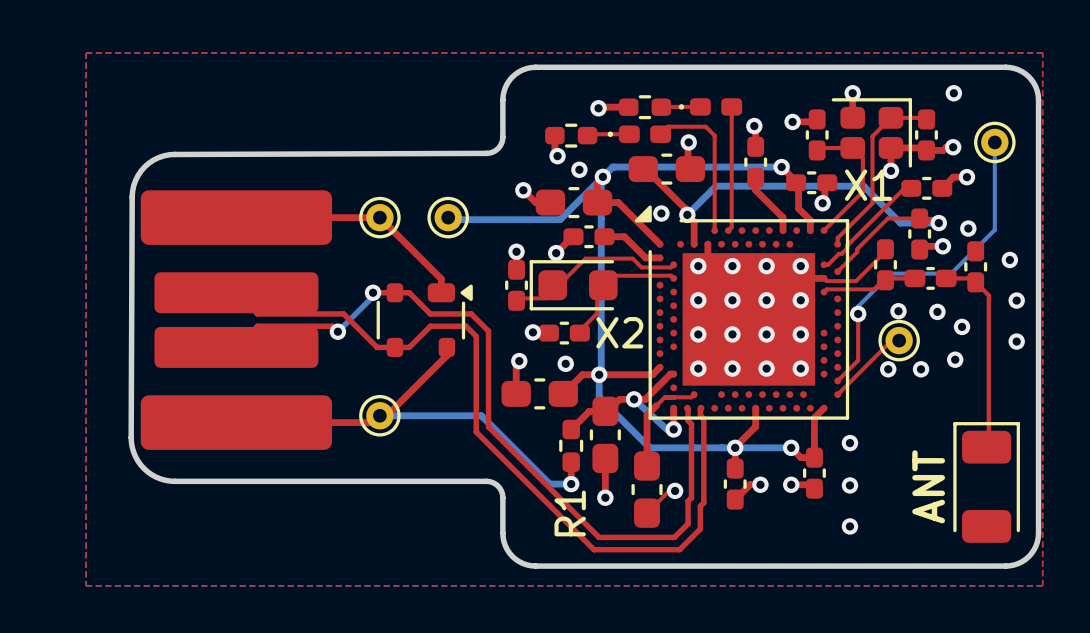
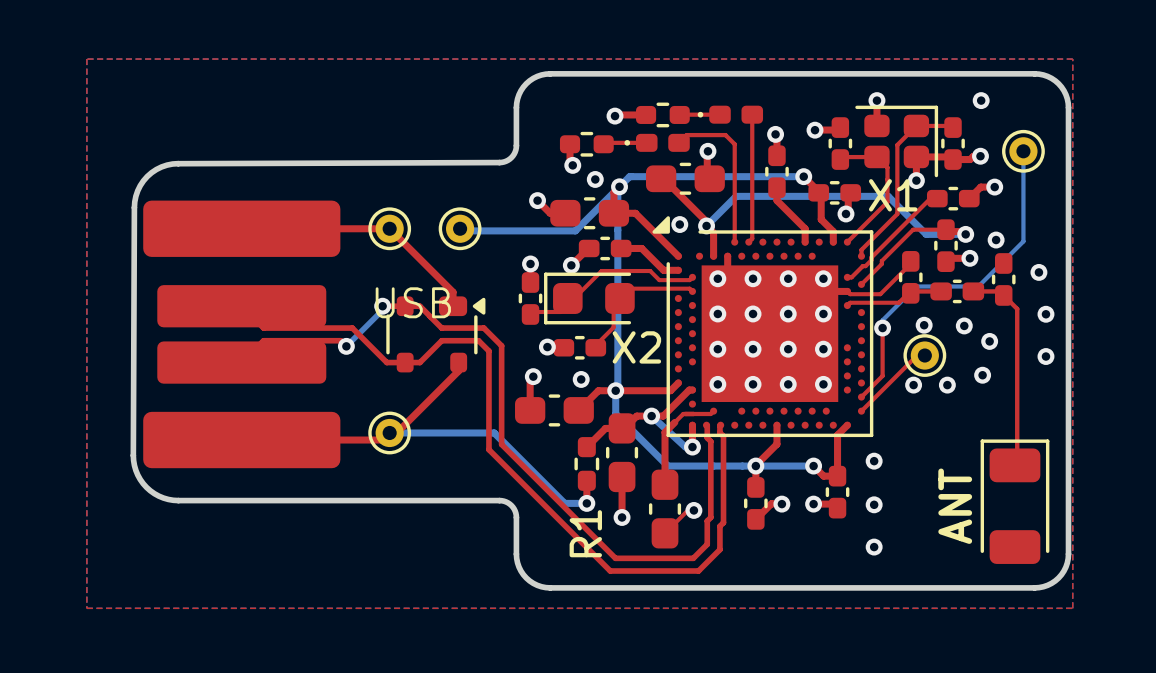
part text: none -> USB (413, 302)

